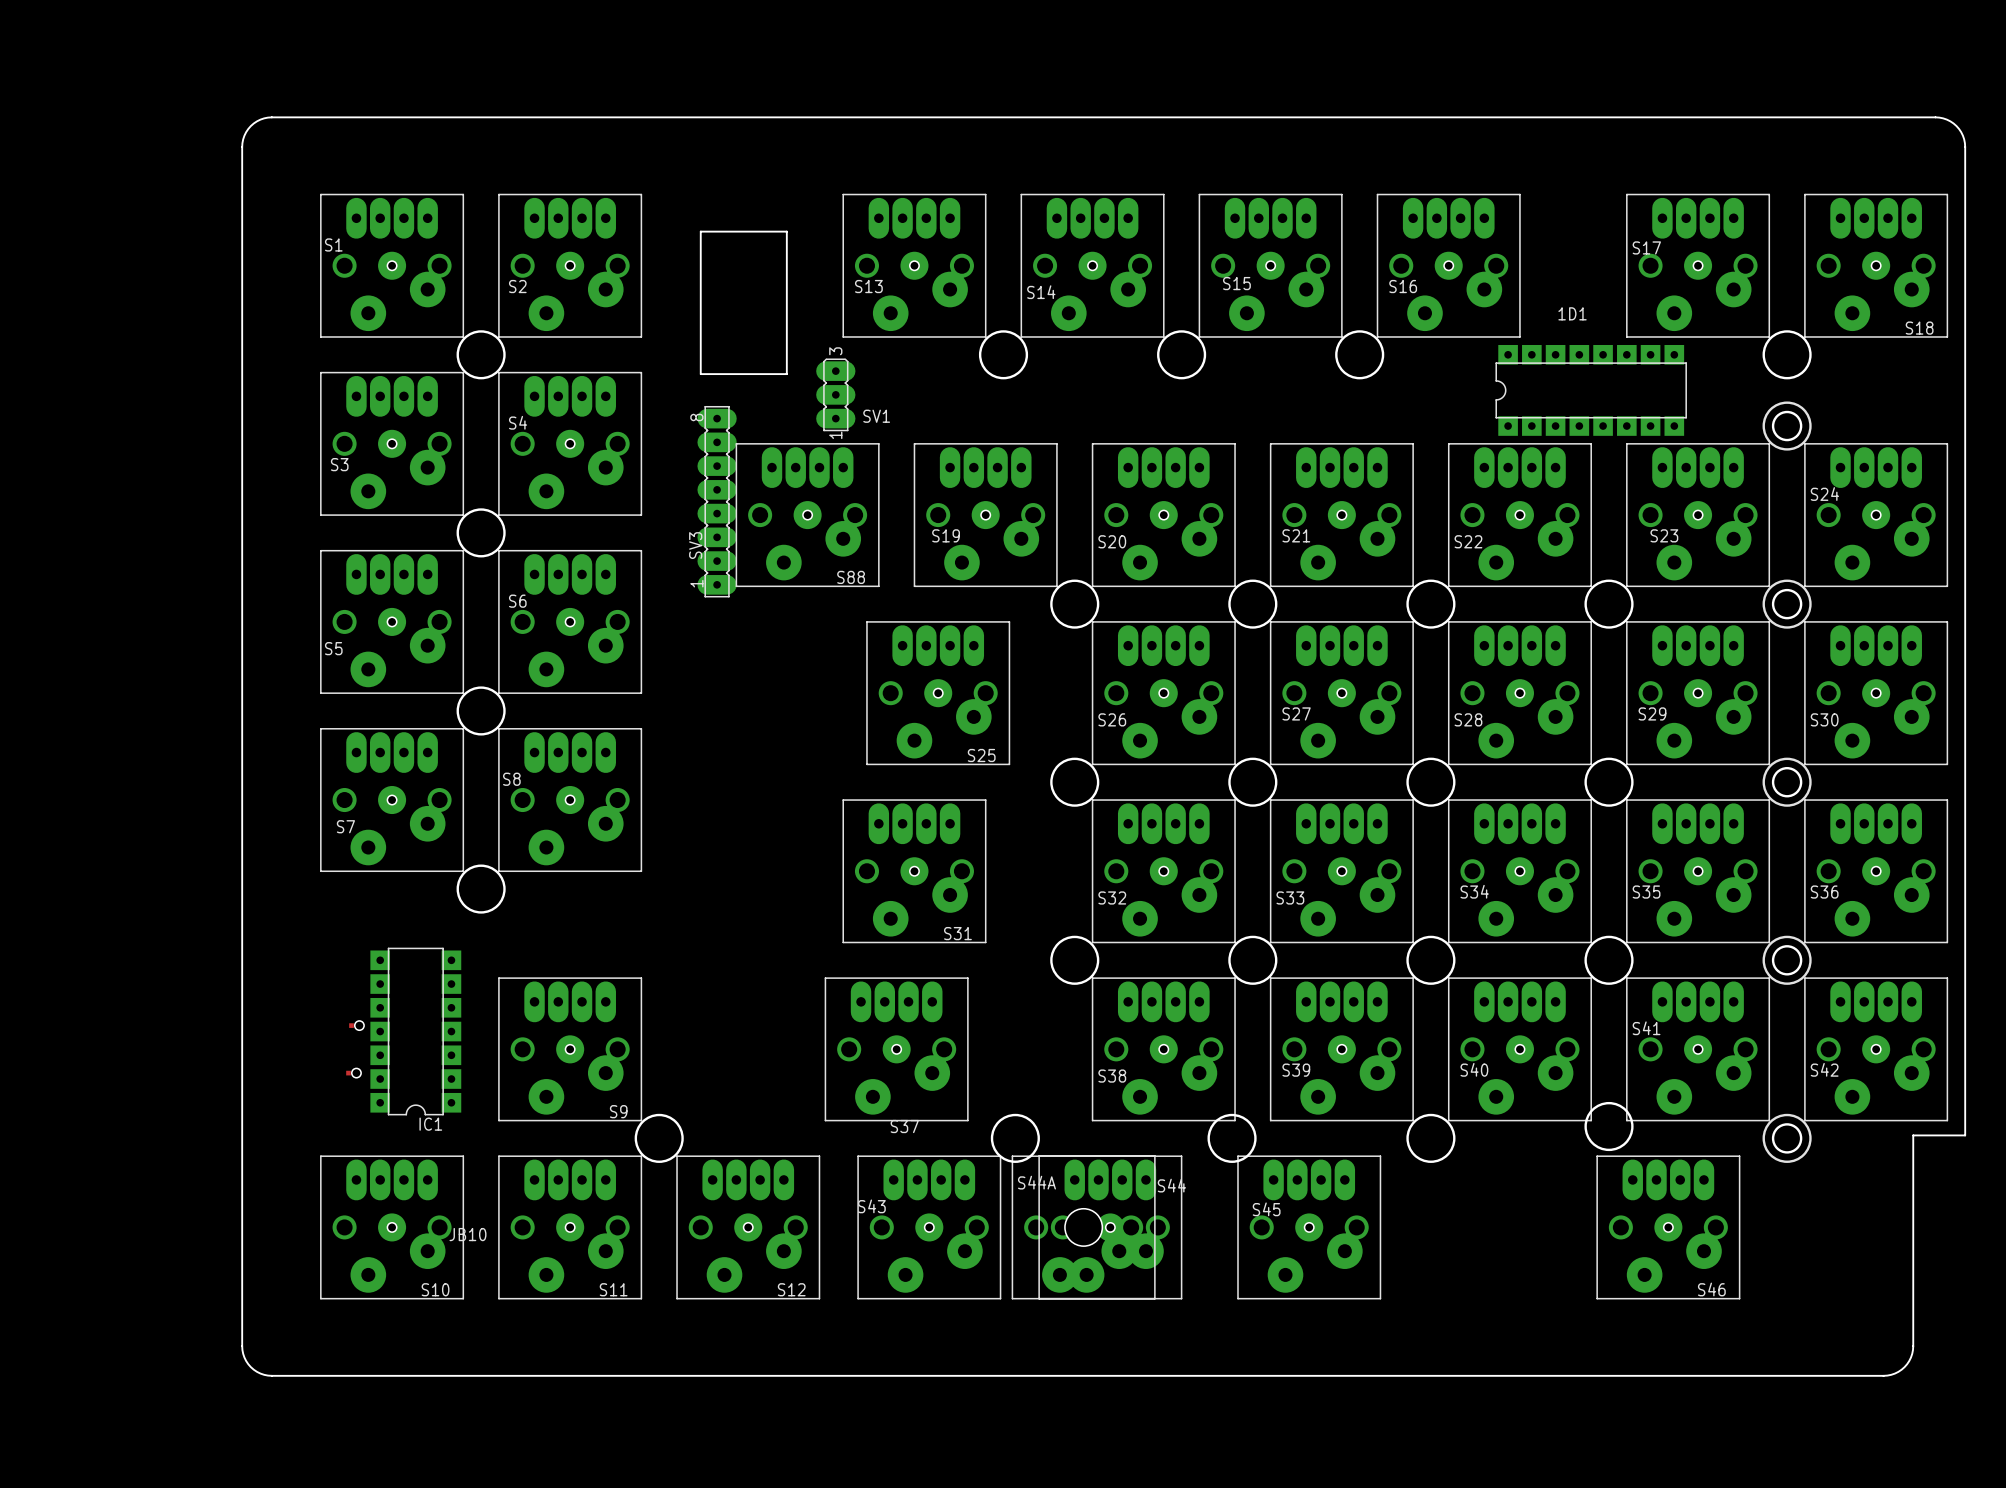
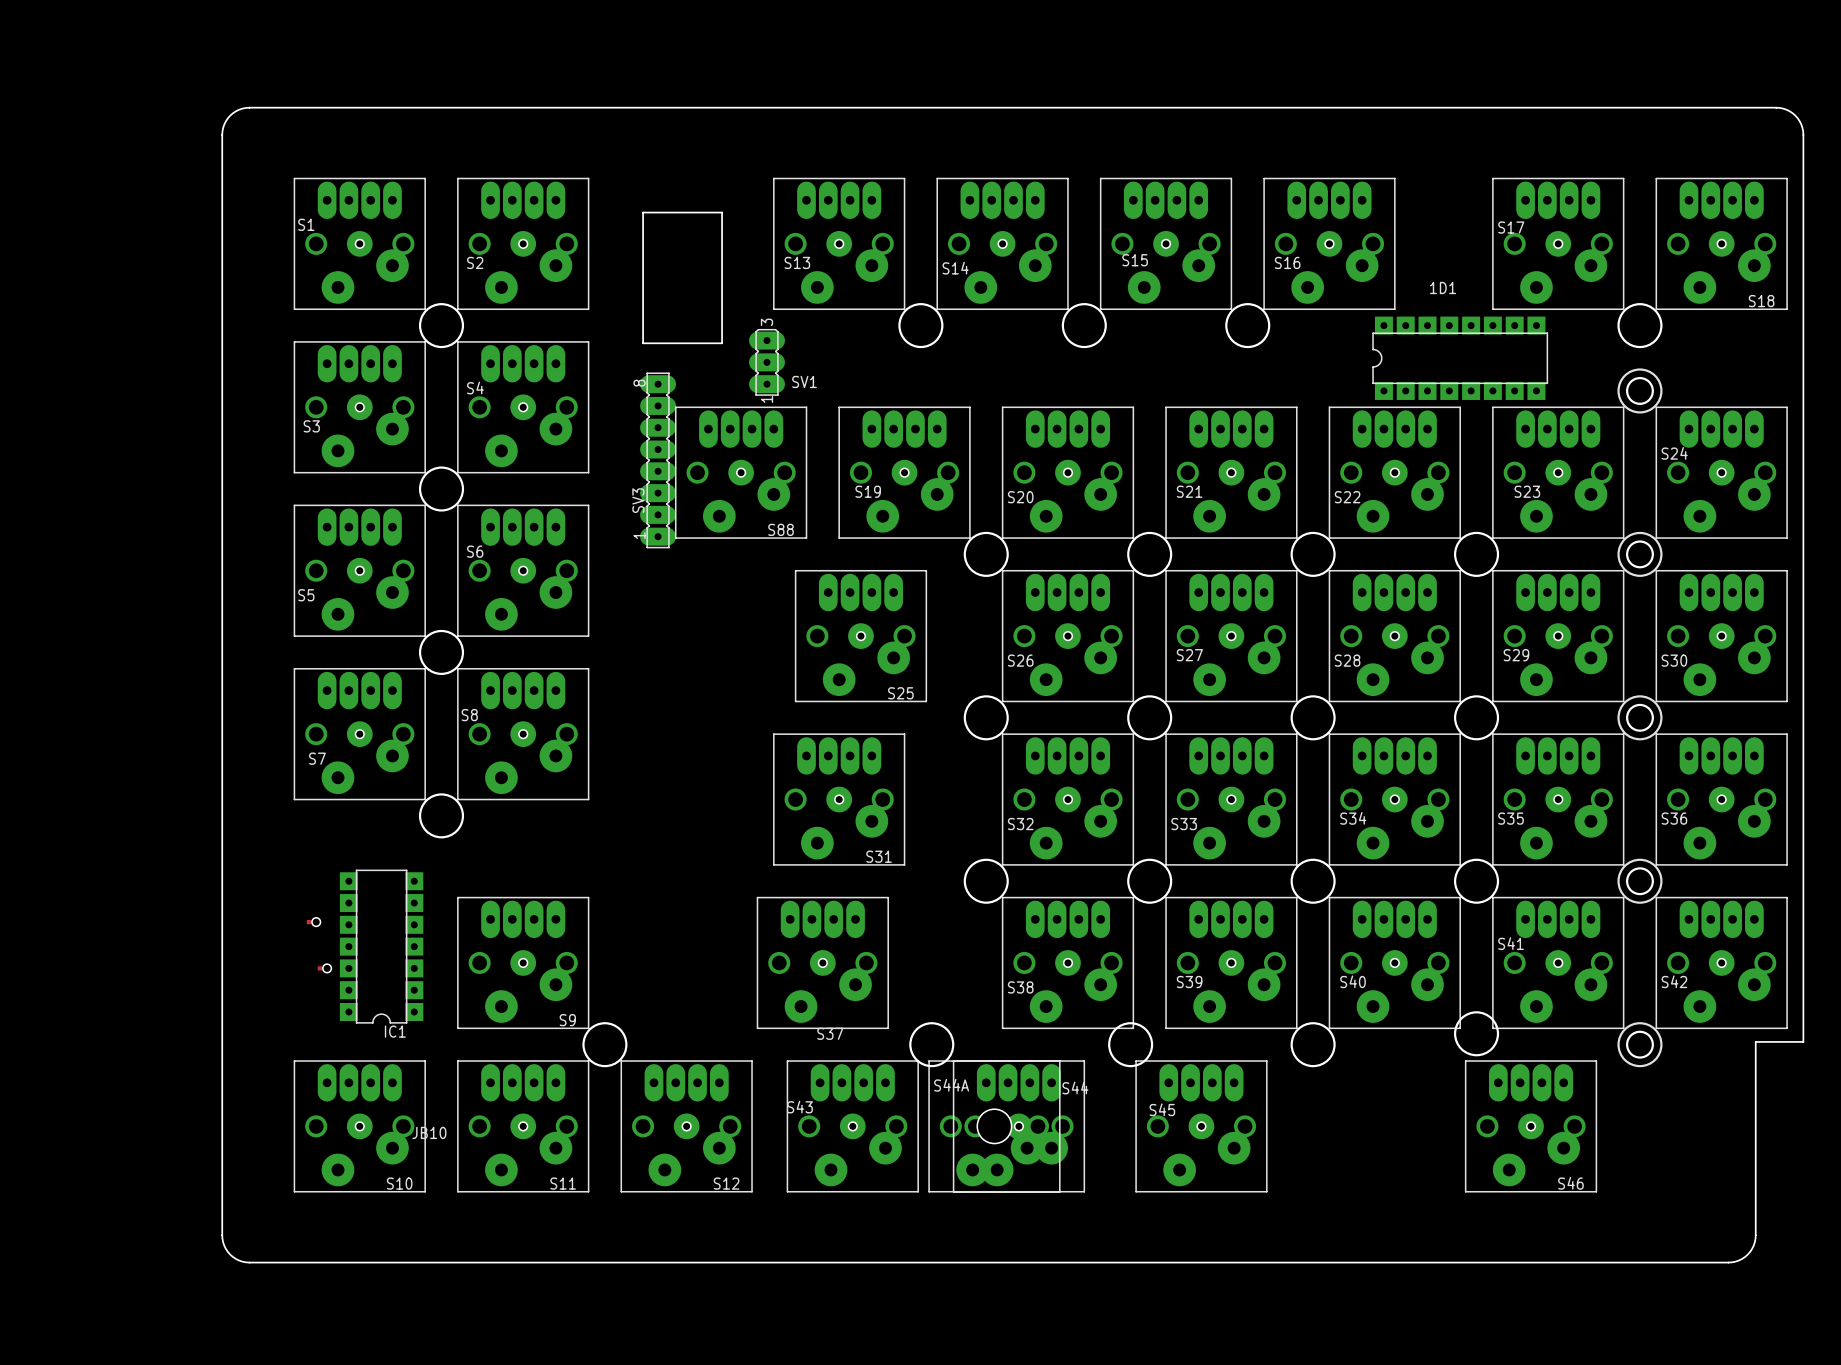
part: none -> (313, 922)
part: (356, 1025) -> none
part: none -> (324, 968)
part: (353, 1073) -> none

